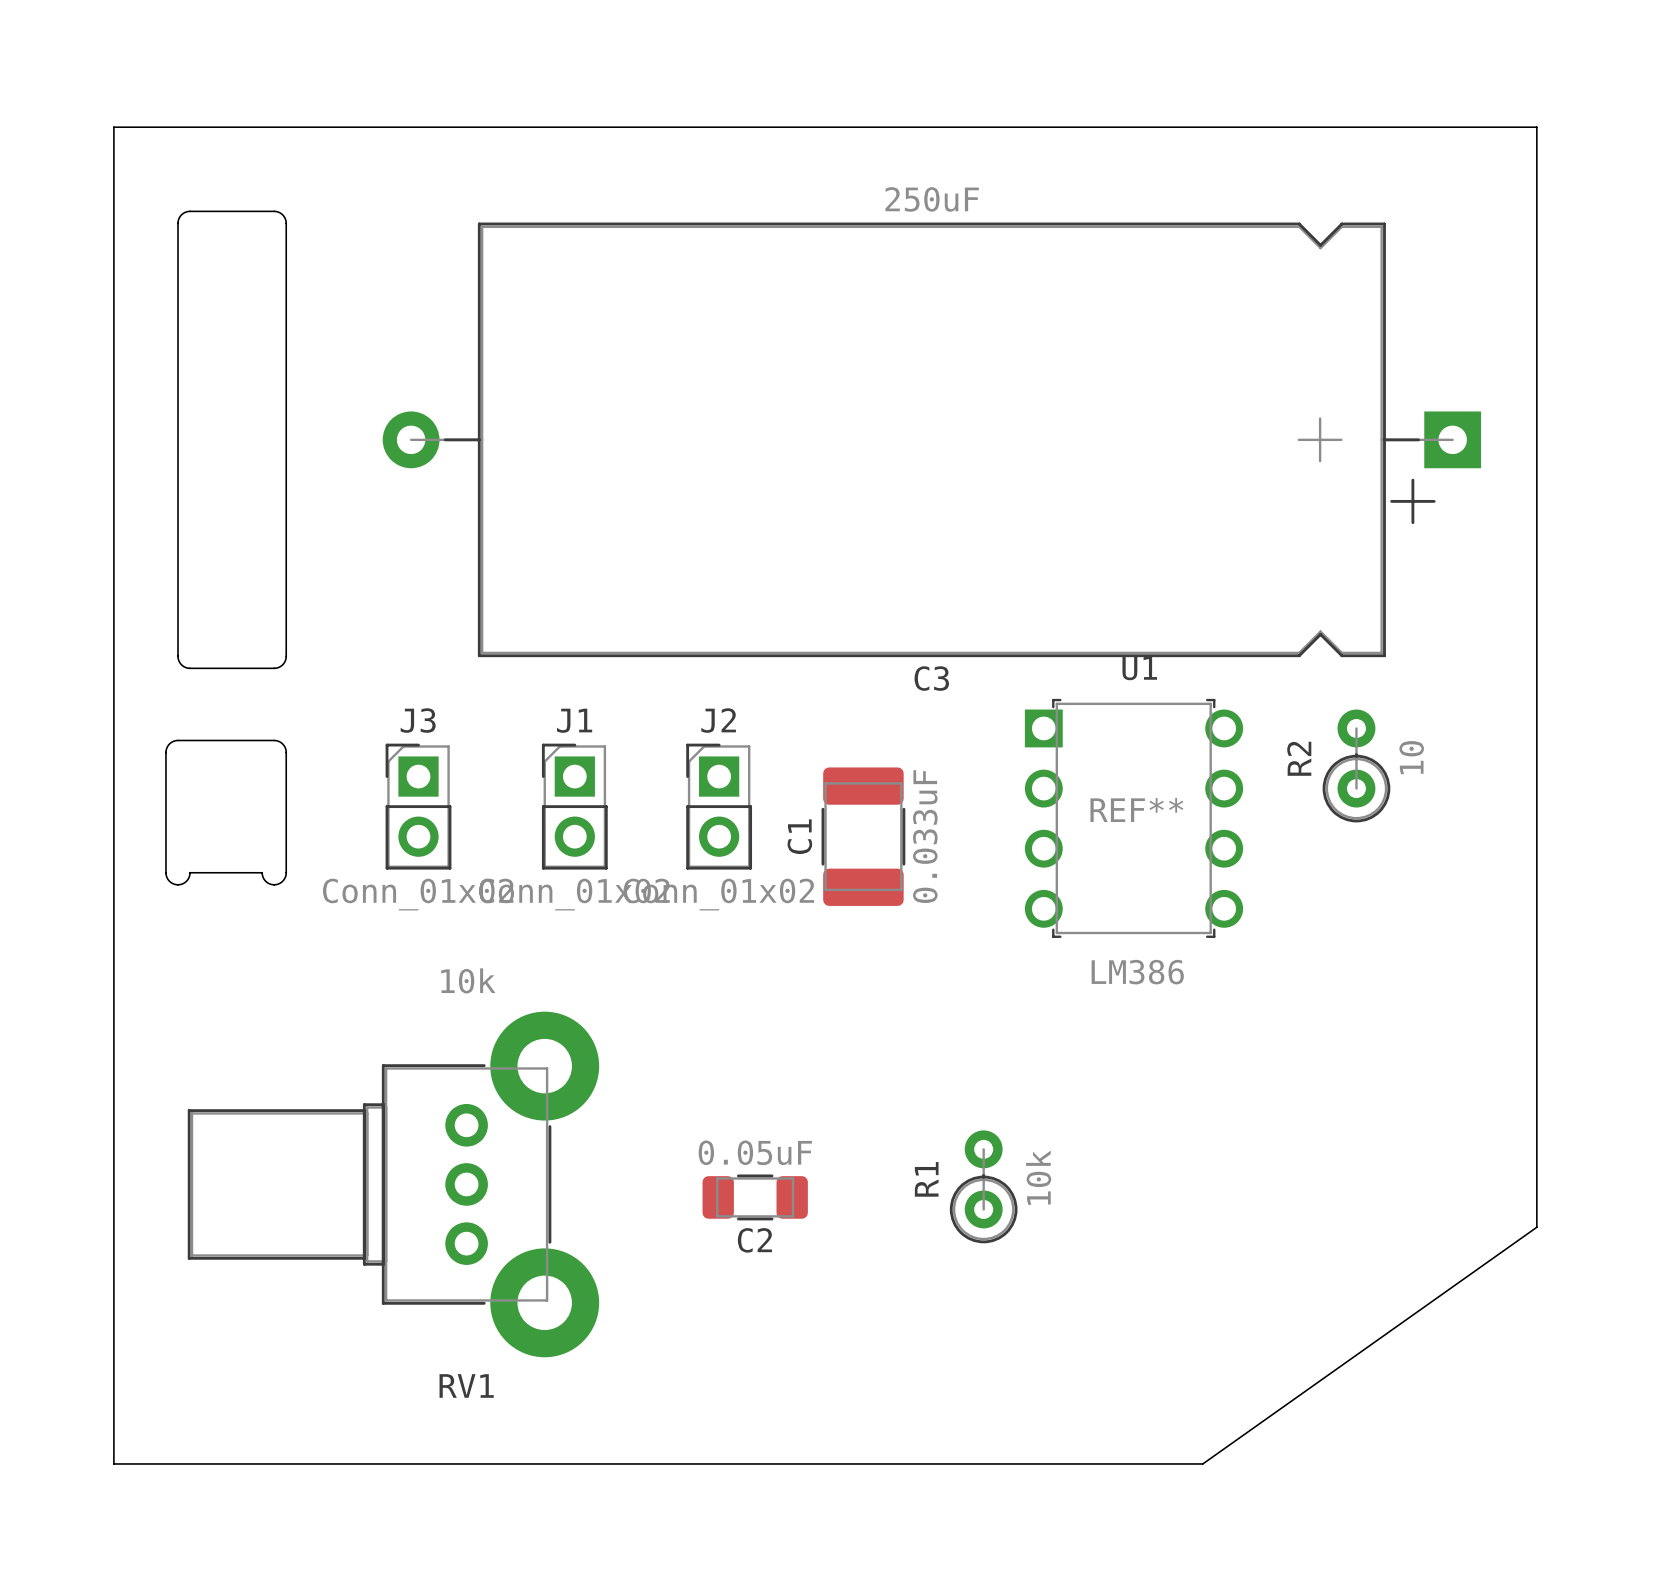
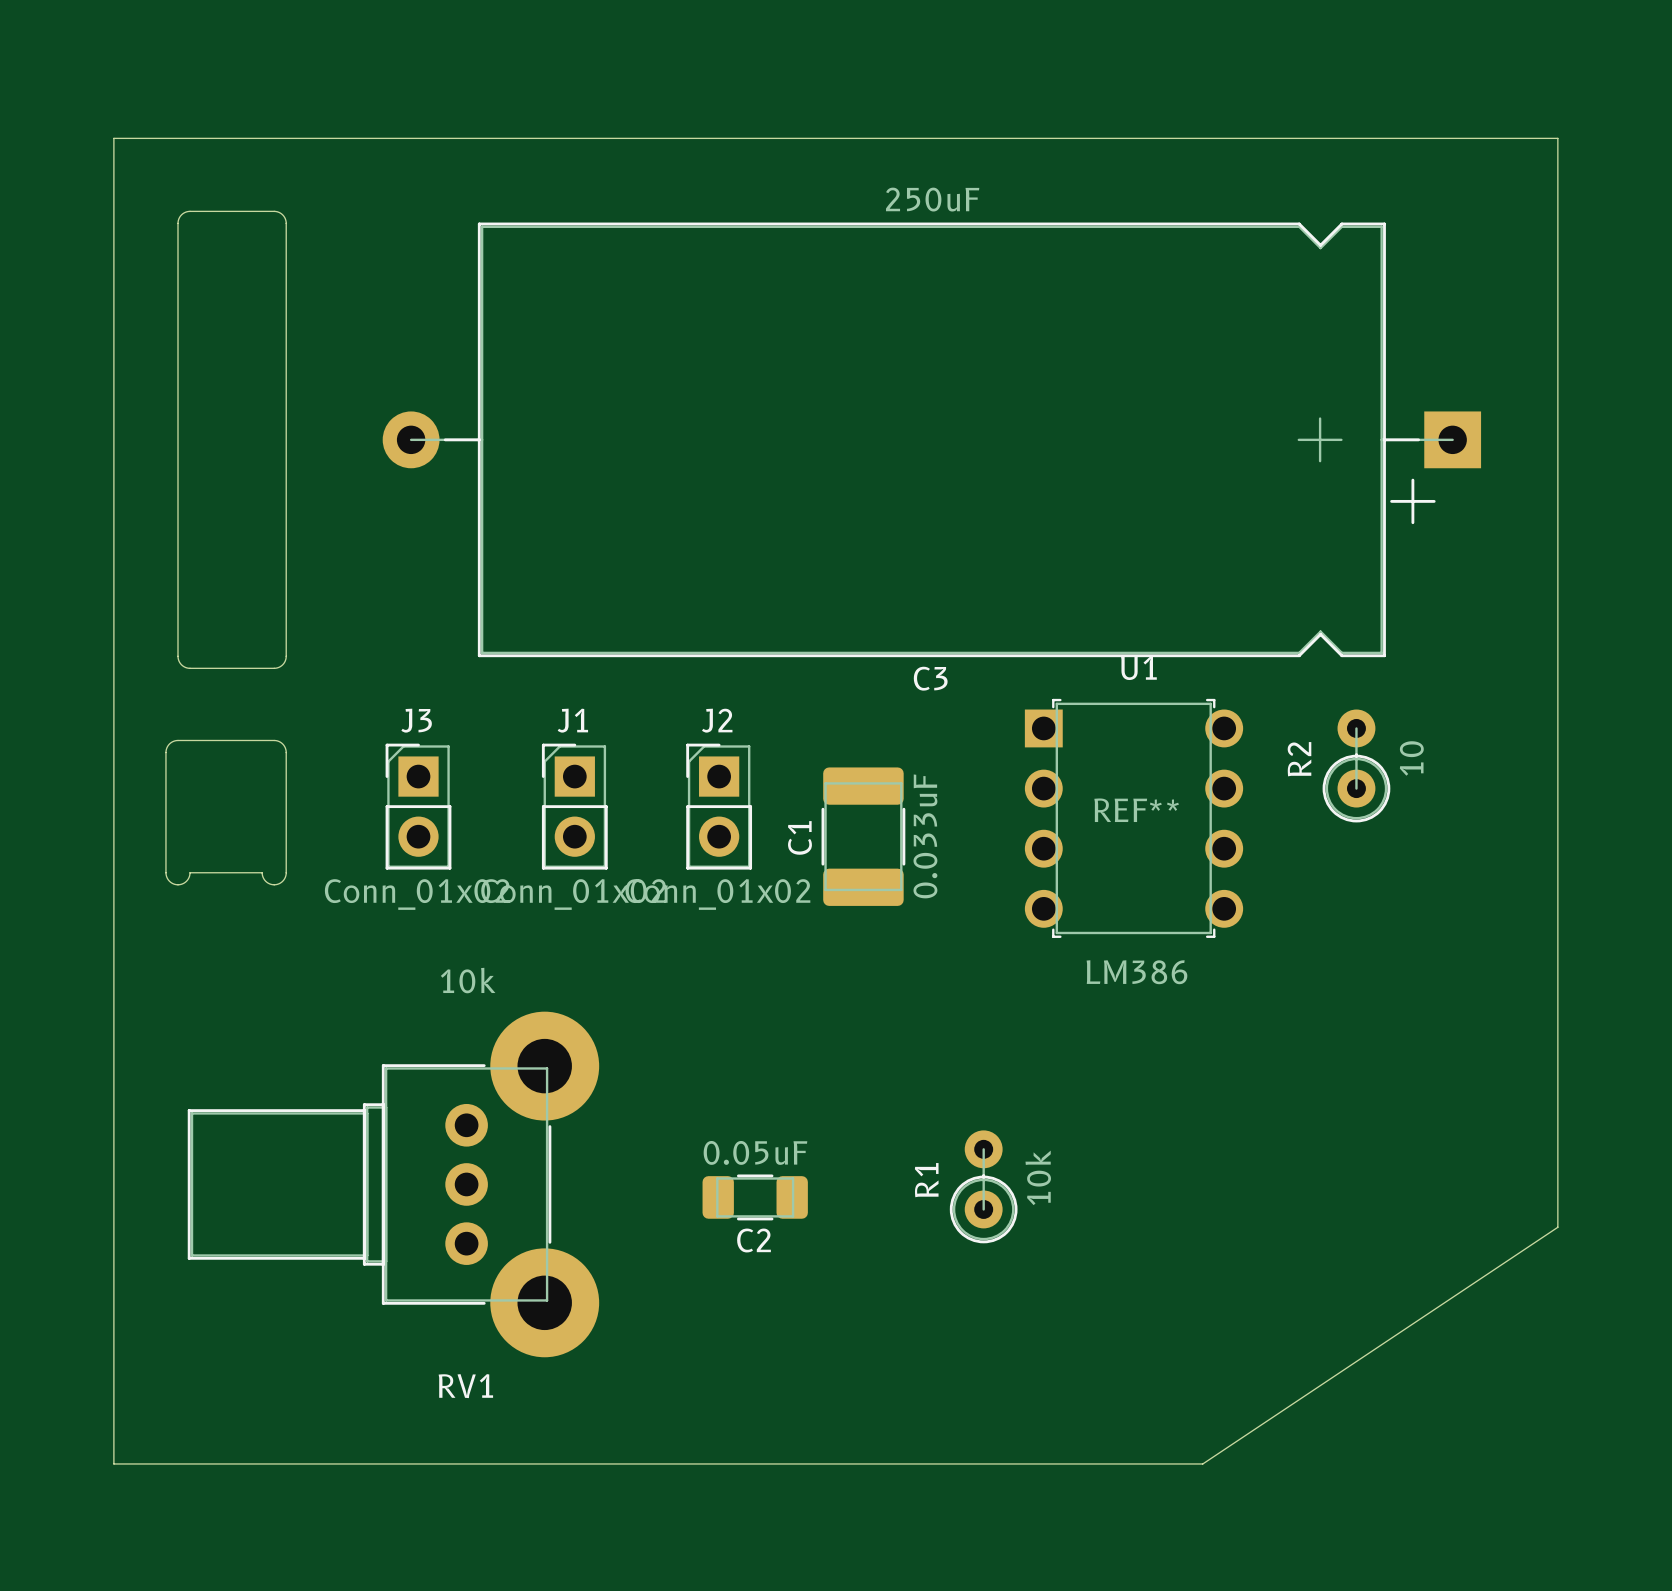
board edge: (113, 138) (113, 127) (1536, 127) (1536, 1227) (1202, 1463) -> (113, 138) (1557, 138) (1557, 1227) (1202, 1463)

